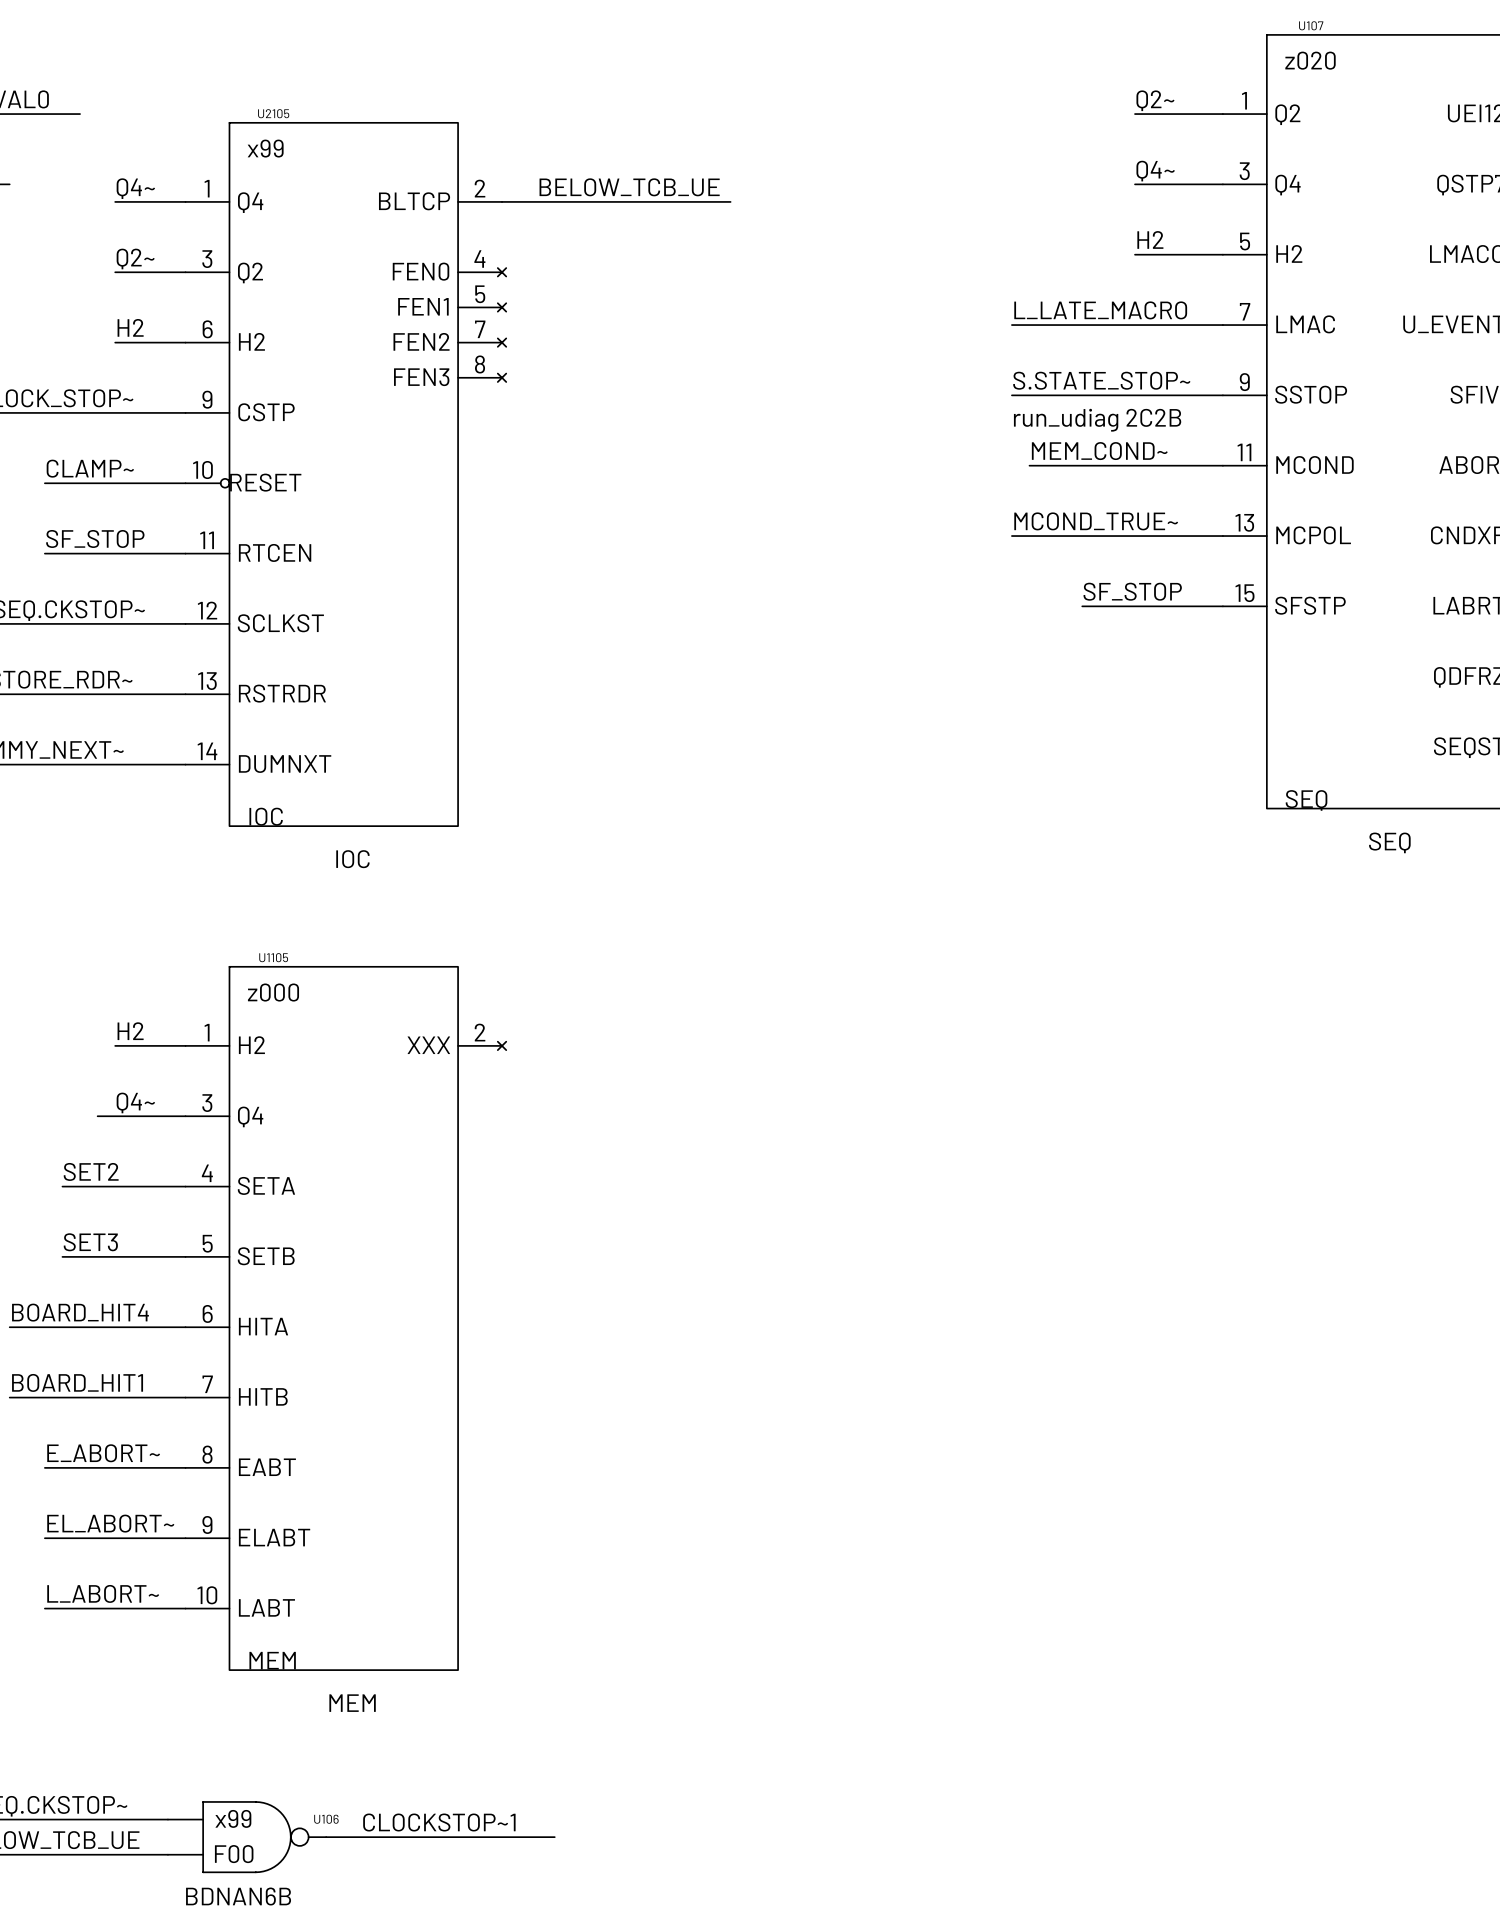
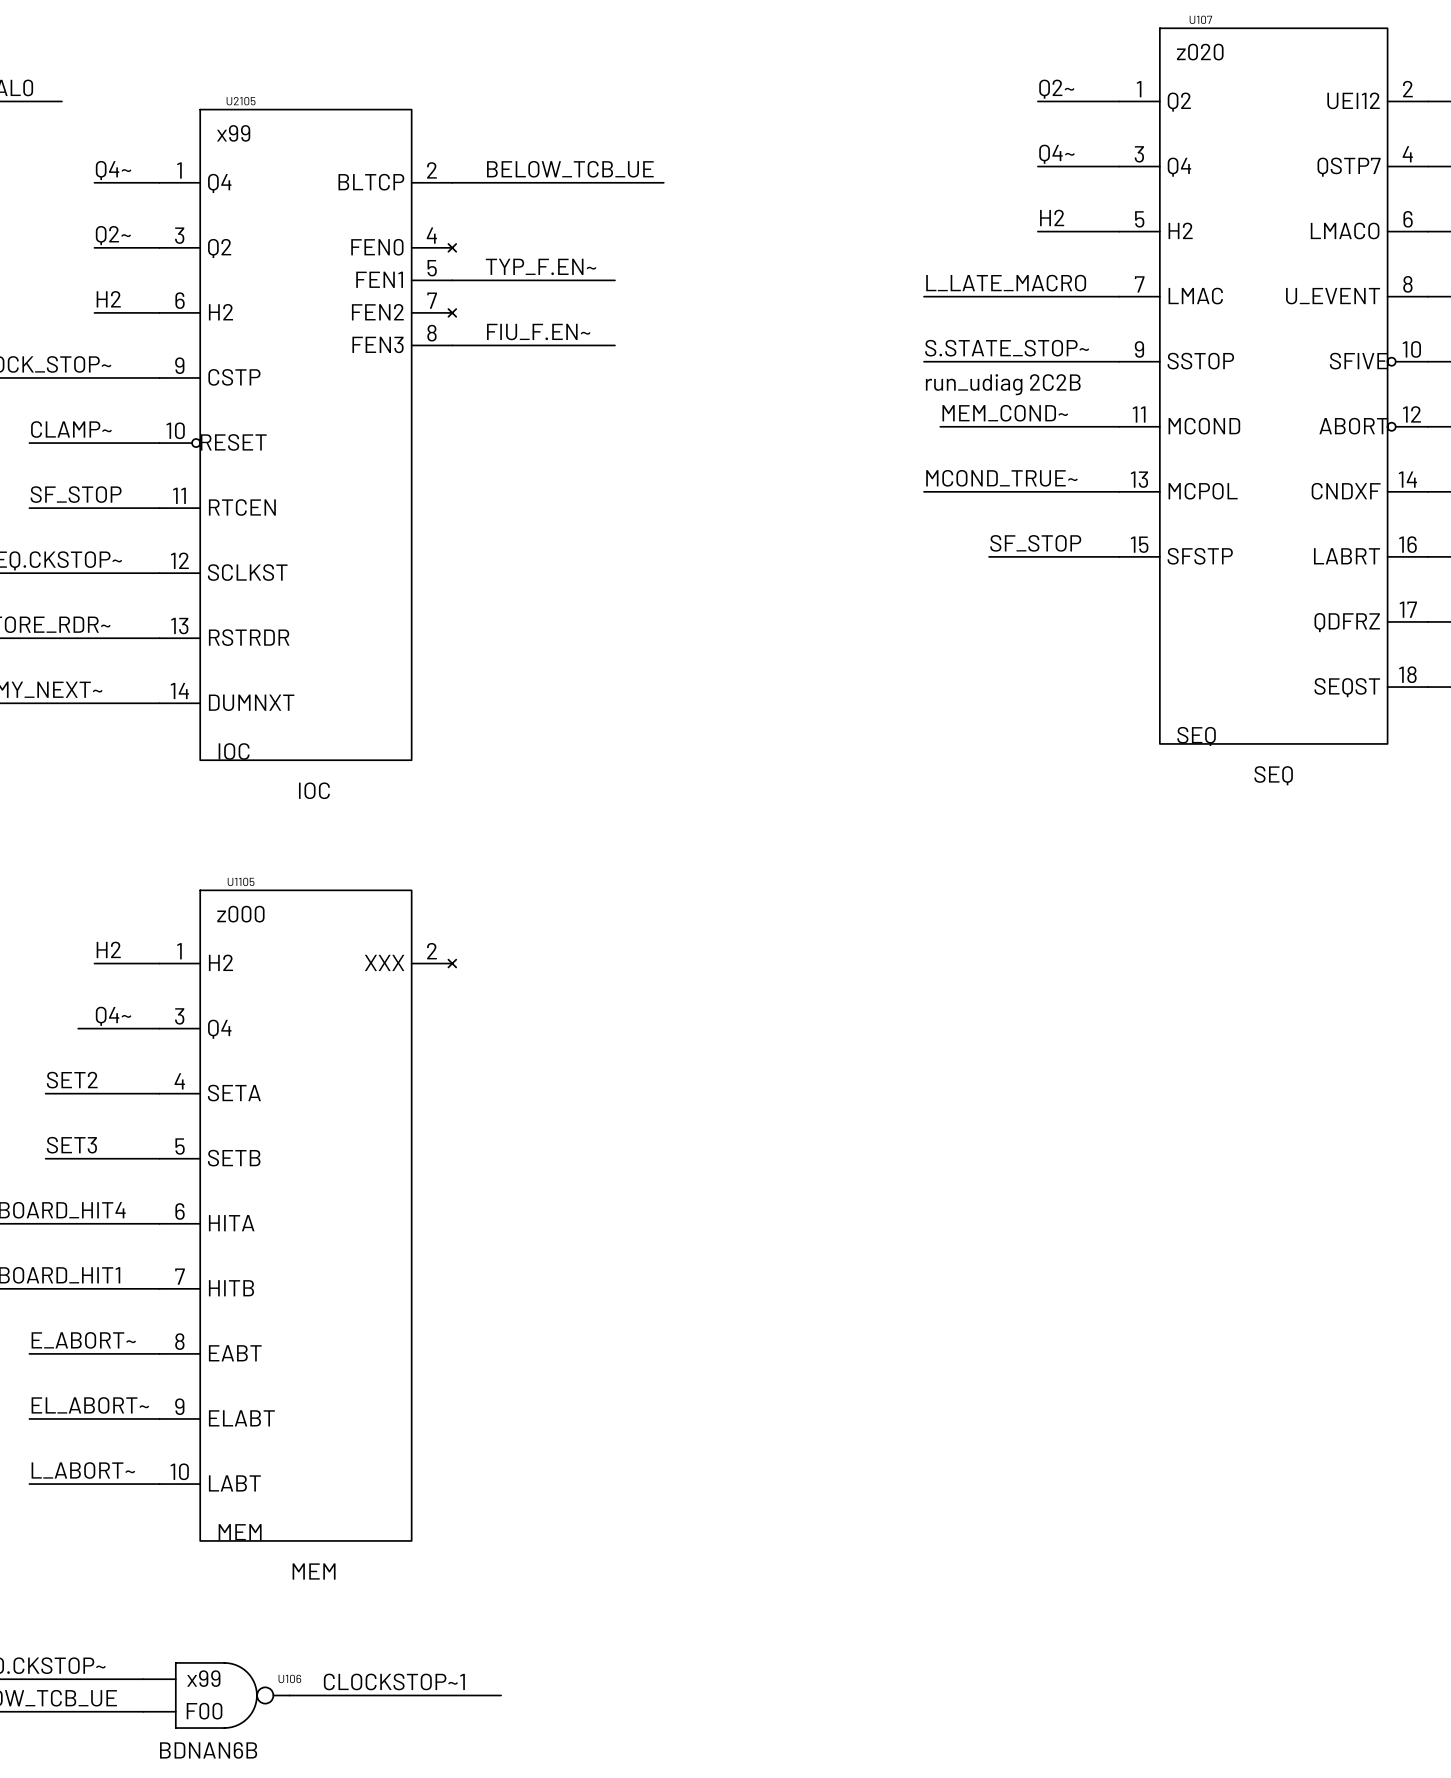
label: none -> TYP_F.EN~ (541, 266)
wire: none -> (452, 280) (614, 280)
no-connect mark: (502, 307) -> none
label: none -> FIU_F.EN~ (538, 332)
wire: none -> (452, 345) (614, 345)
no-connect mark: (502, 377) -> none

